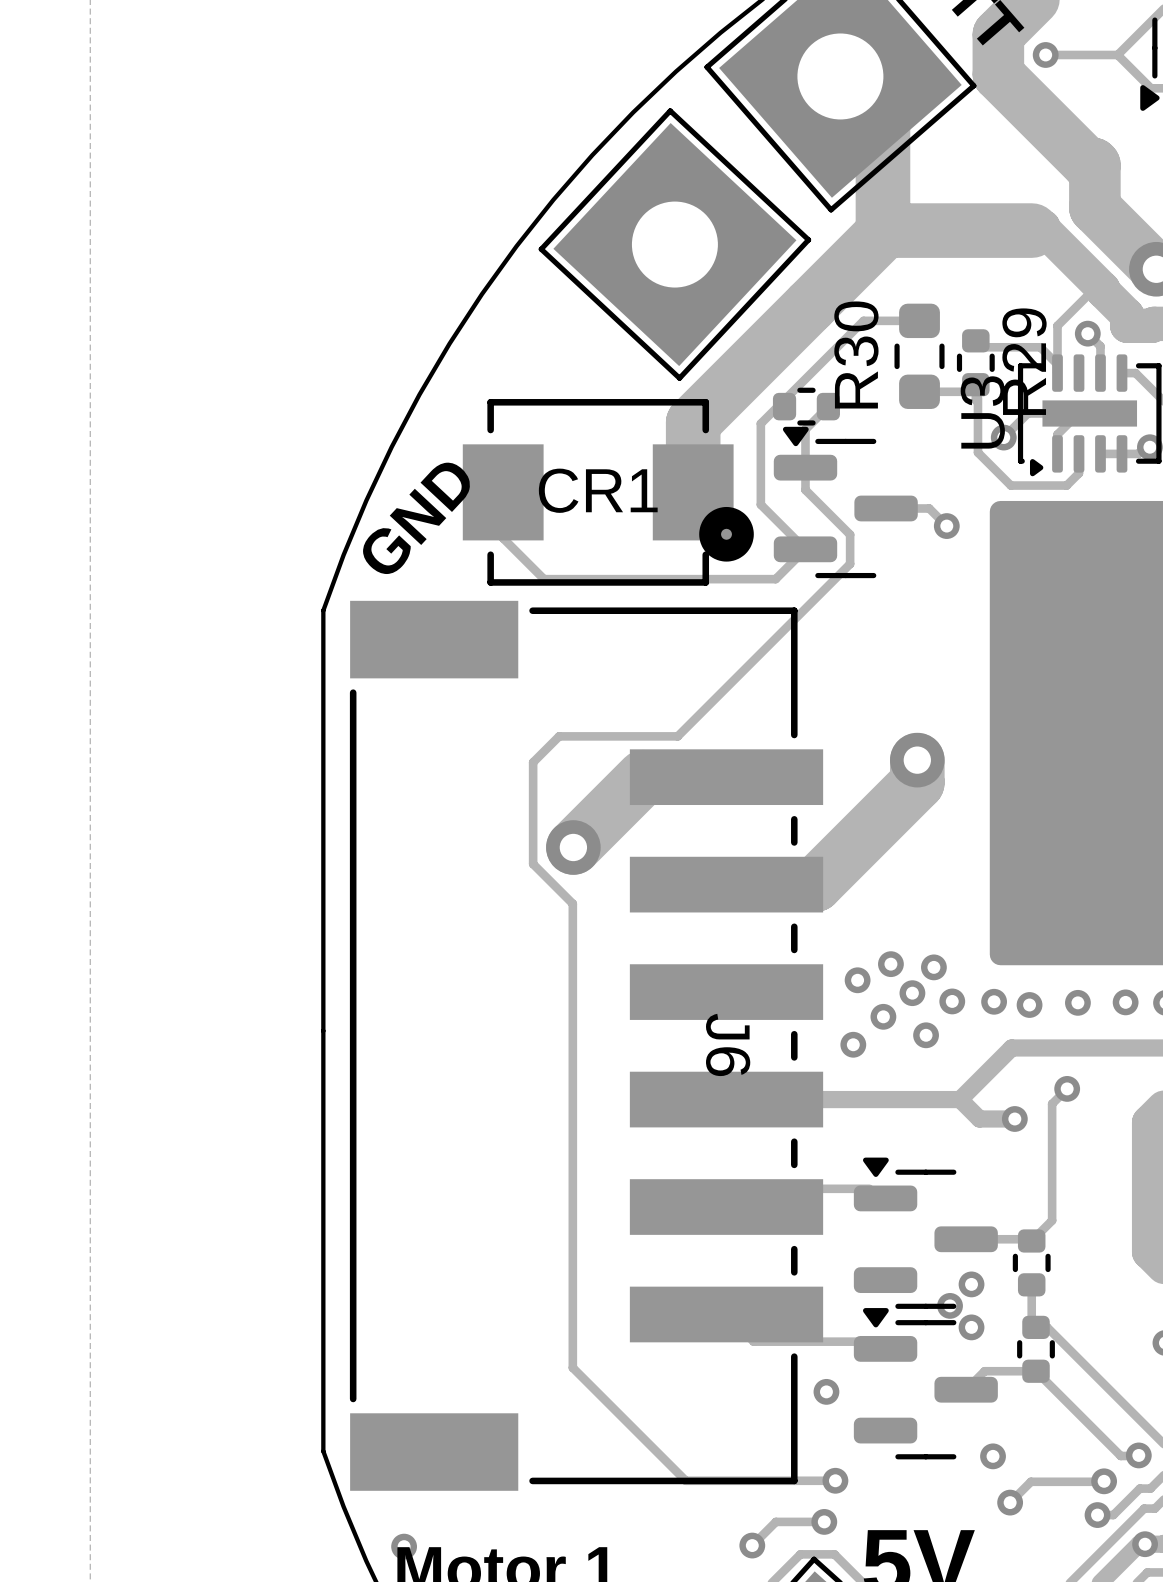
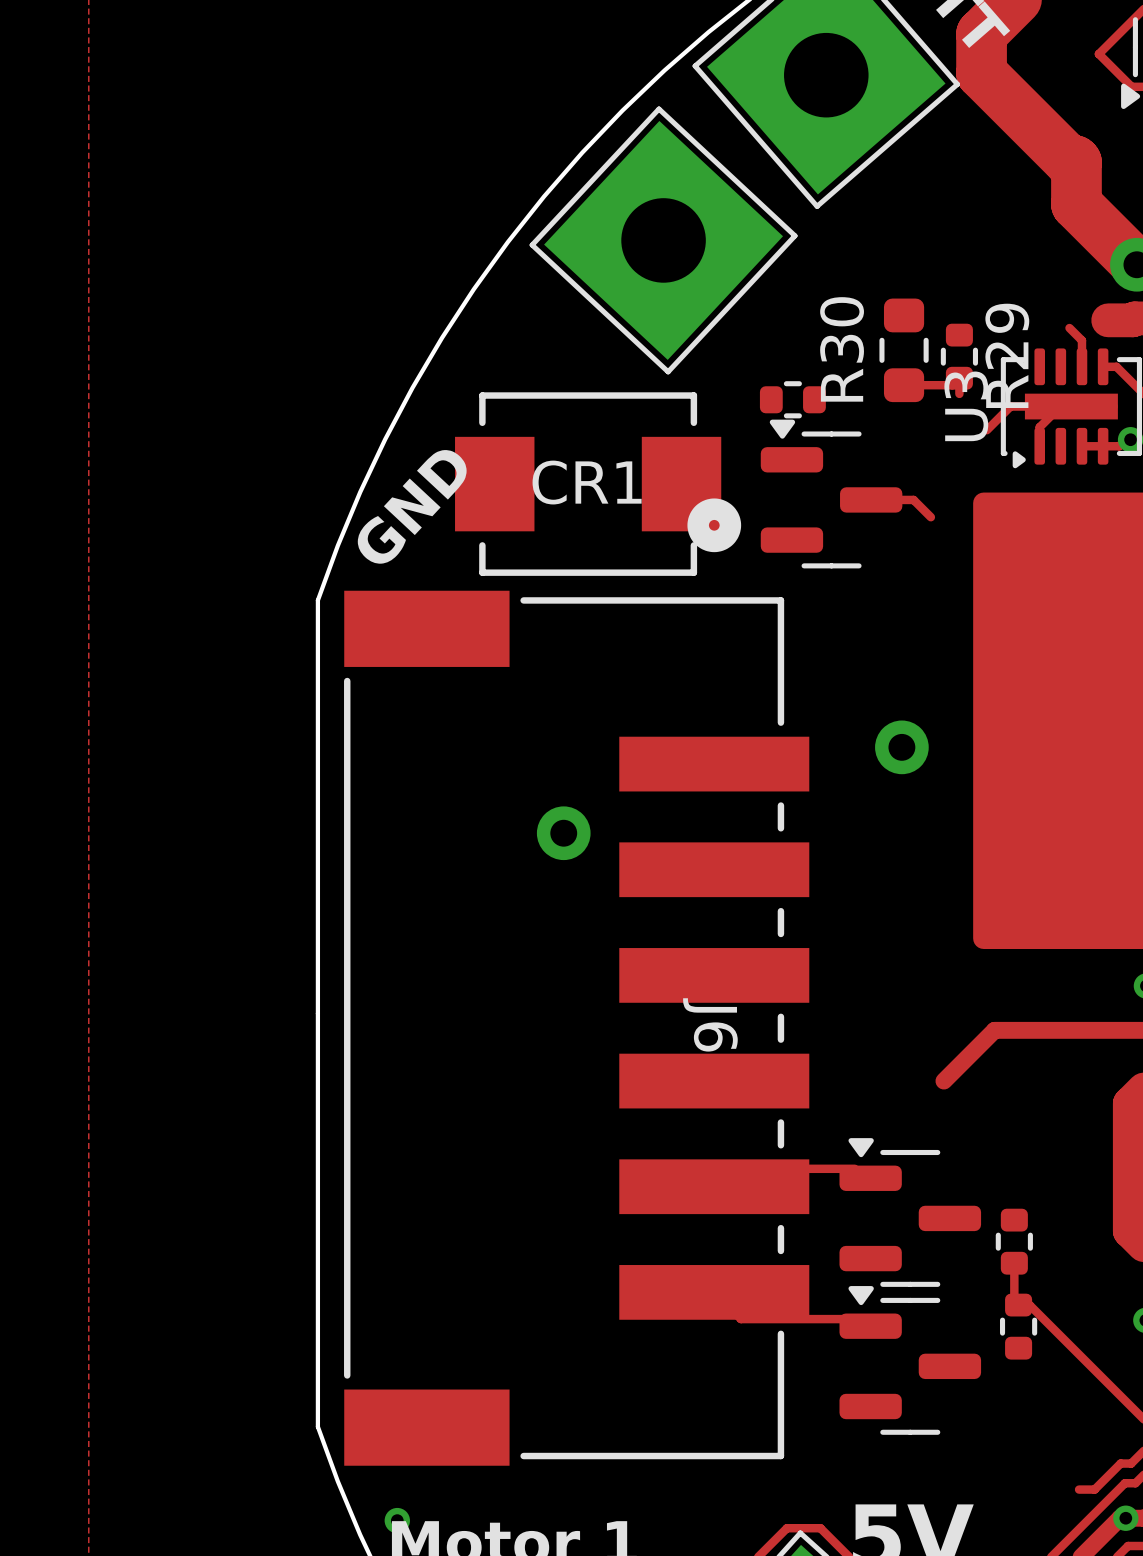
track: (1045, 54) (1117, 54) -> none
via: (1045, 54) -> none
track: (840, 76) (882, 119) (882, 232) (693, 422) (693, 492) -> none
track: (882, 230) (1031, 230) -> none
track: (1031, 230) (1035, 226) (1043, 226) (1043, 229) (1127, 315) (1127, 325) (1092, 290) (1057, 325) (1057, 373) -> none
track: (919, 320) (863, 320) (760, 423) (760, 504) (805, 549) (775, 579) (543, 579) (503, 538) (503, 492) -> none
via: (1087, 333) -> none
track: (975, 340) (982, 347) (1040, 347) (1057, 364) (1057, 372) -> none
track: (977, 398) (977, 452) (1010, 485) (1066, 485) (1078, 473) (1078, 453) -> none
track: (828, 406) (805, 429) (805, 490) (850, 534) (850, 563) (677, 736) (559, 736) (533, 762) (533, 864) (572, 903) (572, 1367) (685, 1480) (835, 1480) -> none
via: (1003, 437) -> none
via: (946, 526) -> none
track: (917, 760) (917, 782) (815, 884) (726, 884) -> none
track: (726, 777) (643, 777) (573, 847) -> none
via: (890, 964) -> none
via: (933, 967) -> none
via: (857, 980) -> none
via: (912, 993) -> none
via: (952, 1001) -> none
via: (994, 1001) -> none
via: (1077, 1002) -> none
via: (1125, 1002) -> none
via: (1029, 1004) -> none
via: (883, 1016) -> none
via: (926, 1035) -> none
via: (853, 1044) -> none
track: (1067, 1088) (1052, 1103) (1052, 1220) (1031, 1240) (1029, 1239) (966, 1239) -> none
via: (1067, 1088) -> none
track: (726, 1099) (960, 1099) (979, 1118) (1014, 1118) -> none
via: (1014, 1118) -> none
via: (971, 1284) -> none
via: (950, 1305) -> none
via: (971, 1327) -> none
track: (966, 1389) (984, 1371) (1036, 1371) (1120, 1455) (1129, 1455) -> none
via: (826, 1391) -> none
via: (1138, 1455) -> none
via: (993, 1456) -> none
via: (835, 1480) -> none
track: (1103, 1481) (1030, 1481) (1010, 1502) -> none
via: (1104, 1481) -> none
via: (1010, 1502) -> none
via: (1097, 1515) -> none
track: (824, 1521) (775, 1521) (752, 1545) -> none
via: (824, 1521) -> none
via: (752, 1545) -> none

